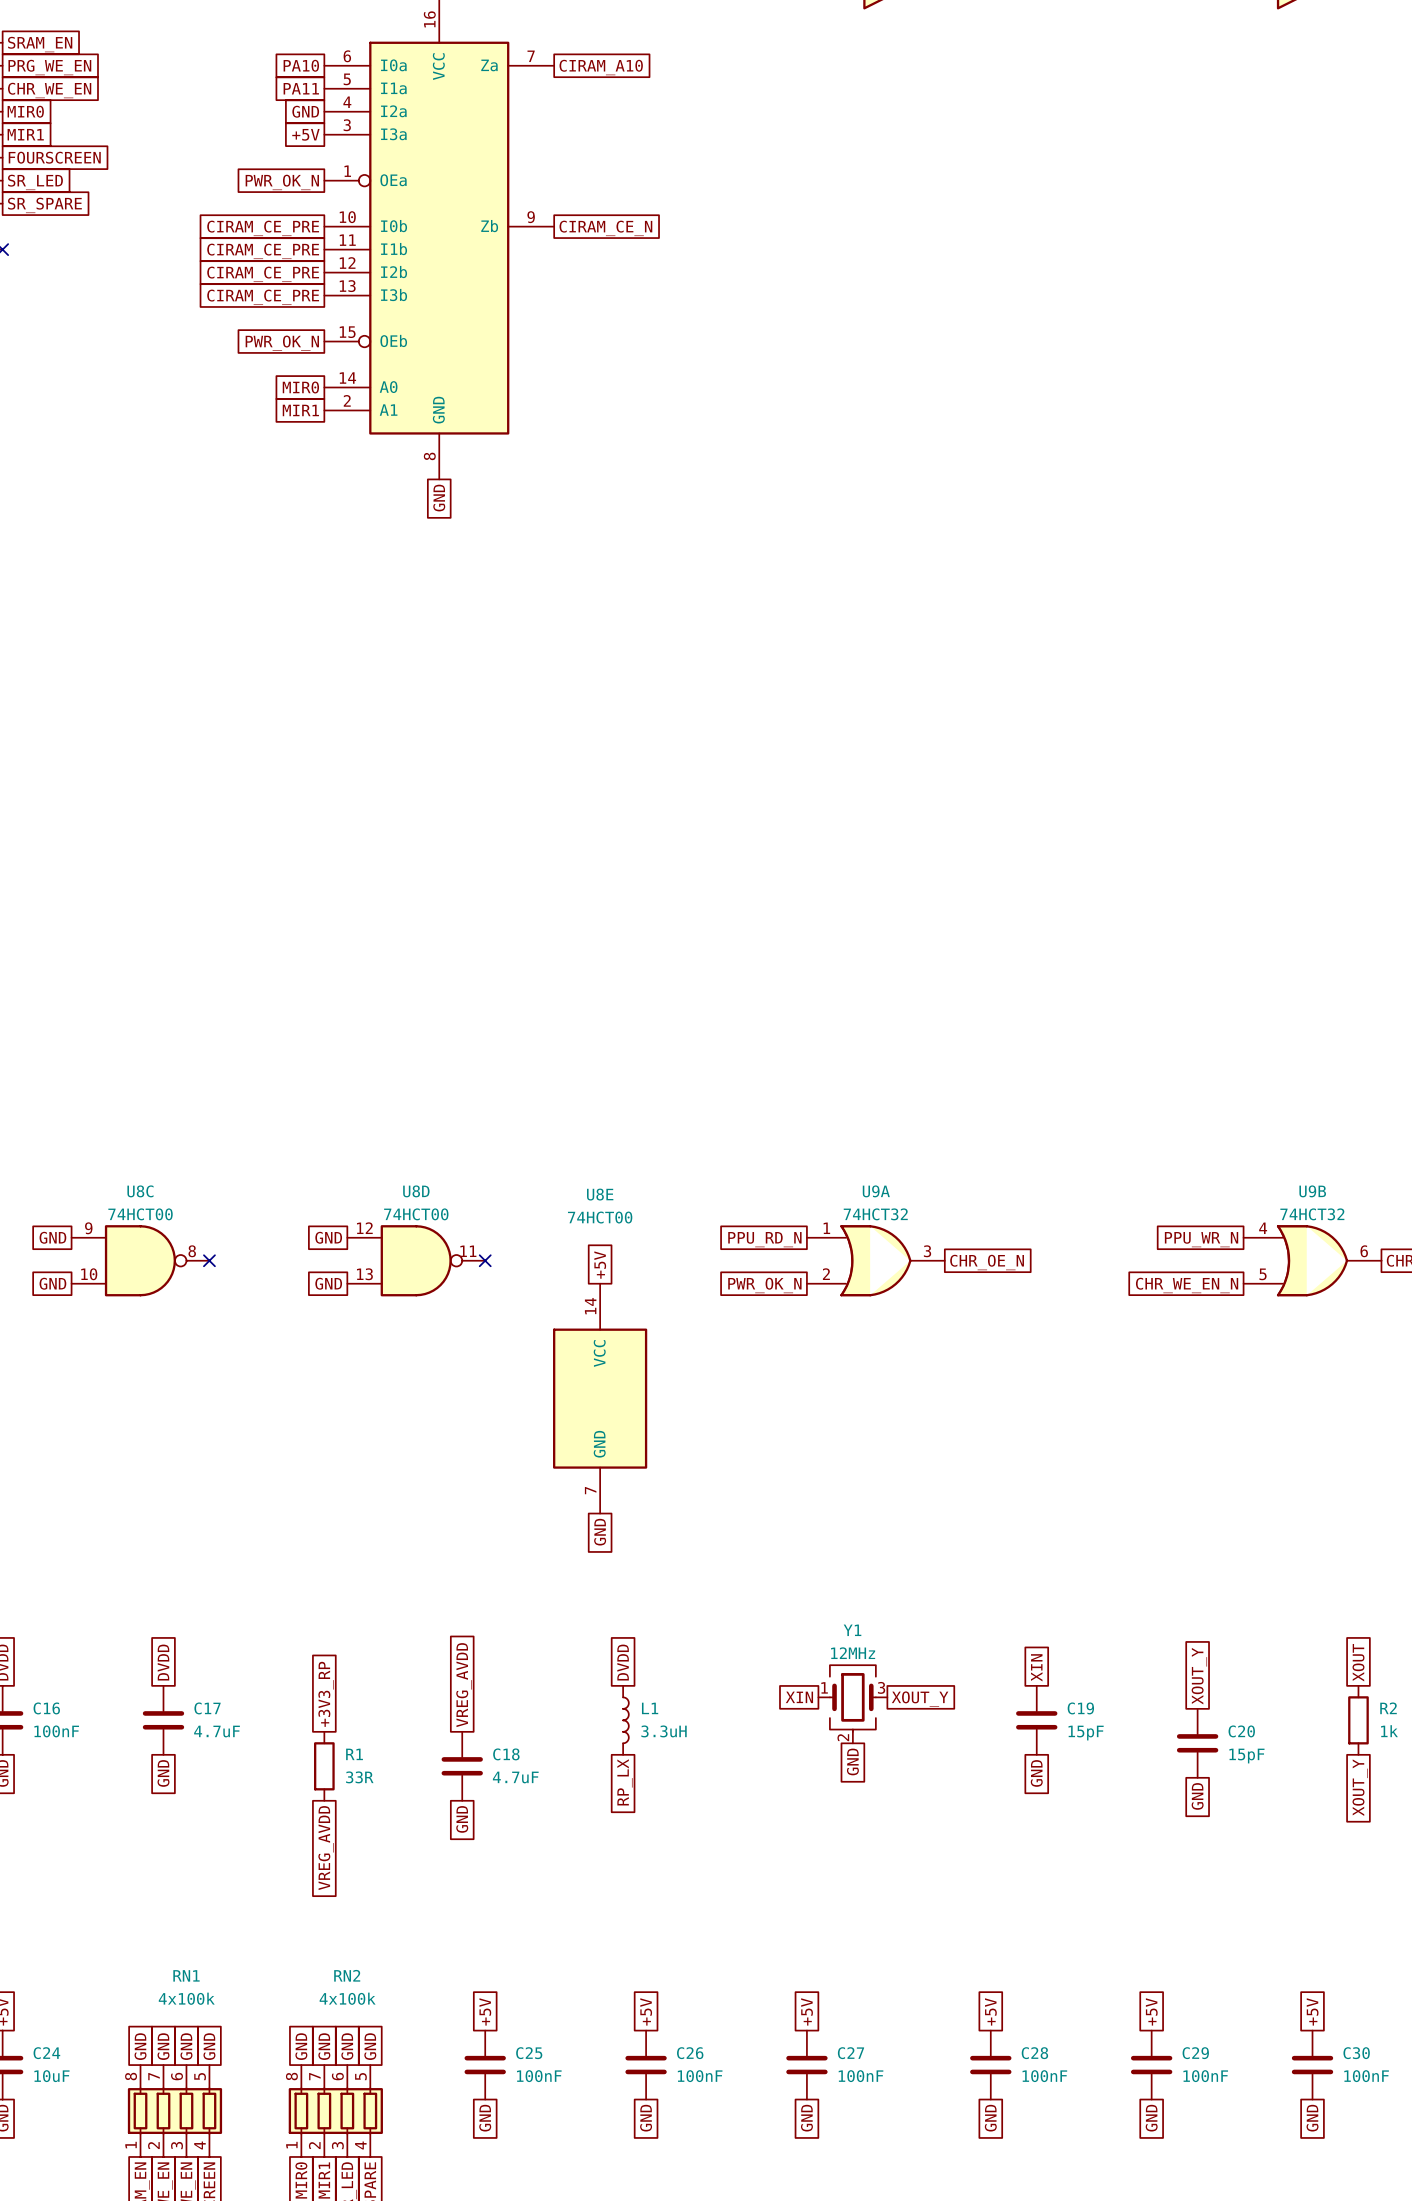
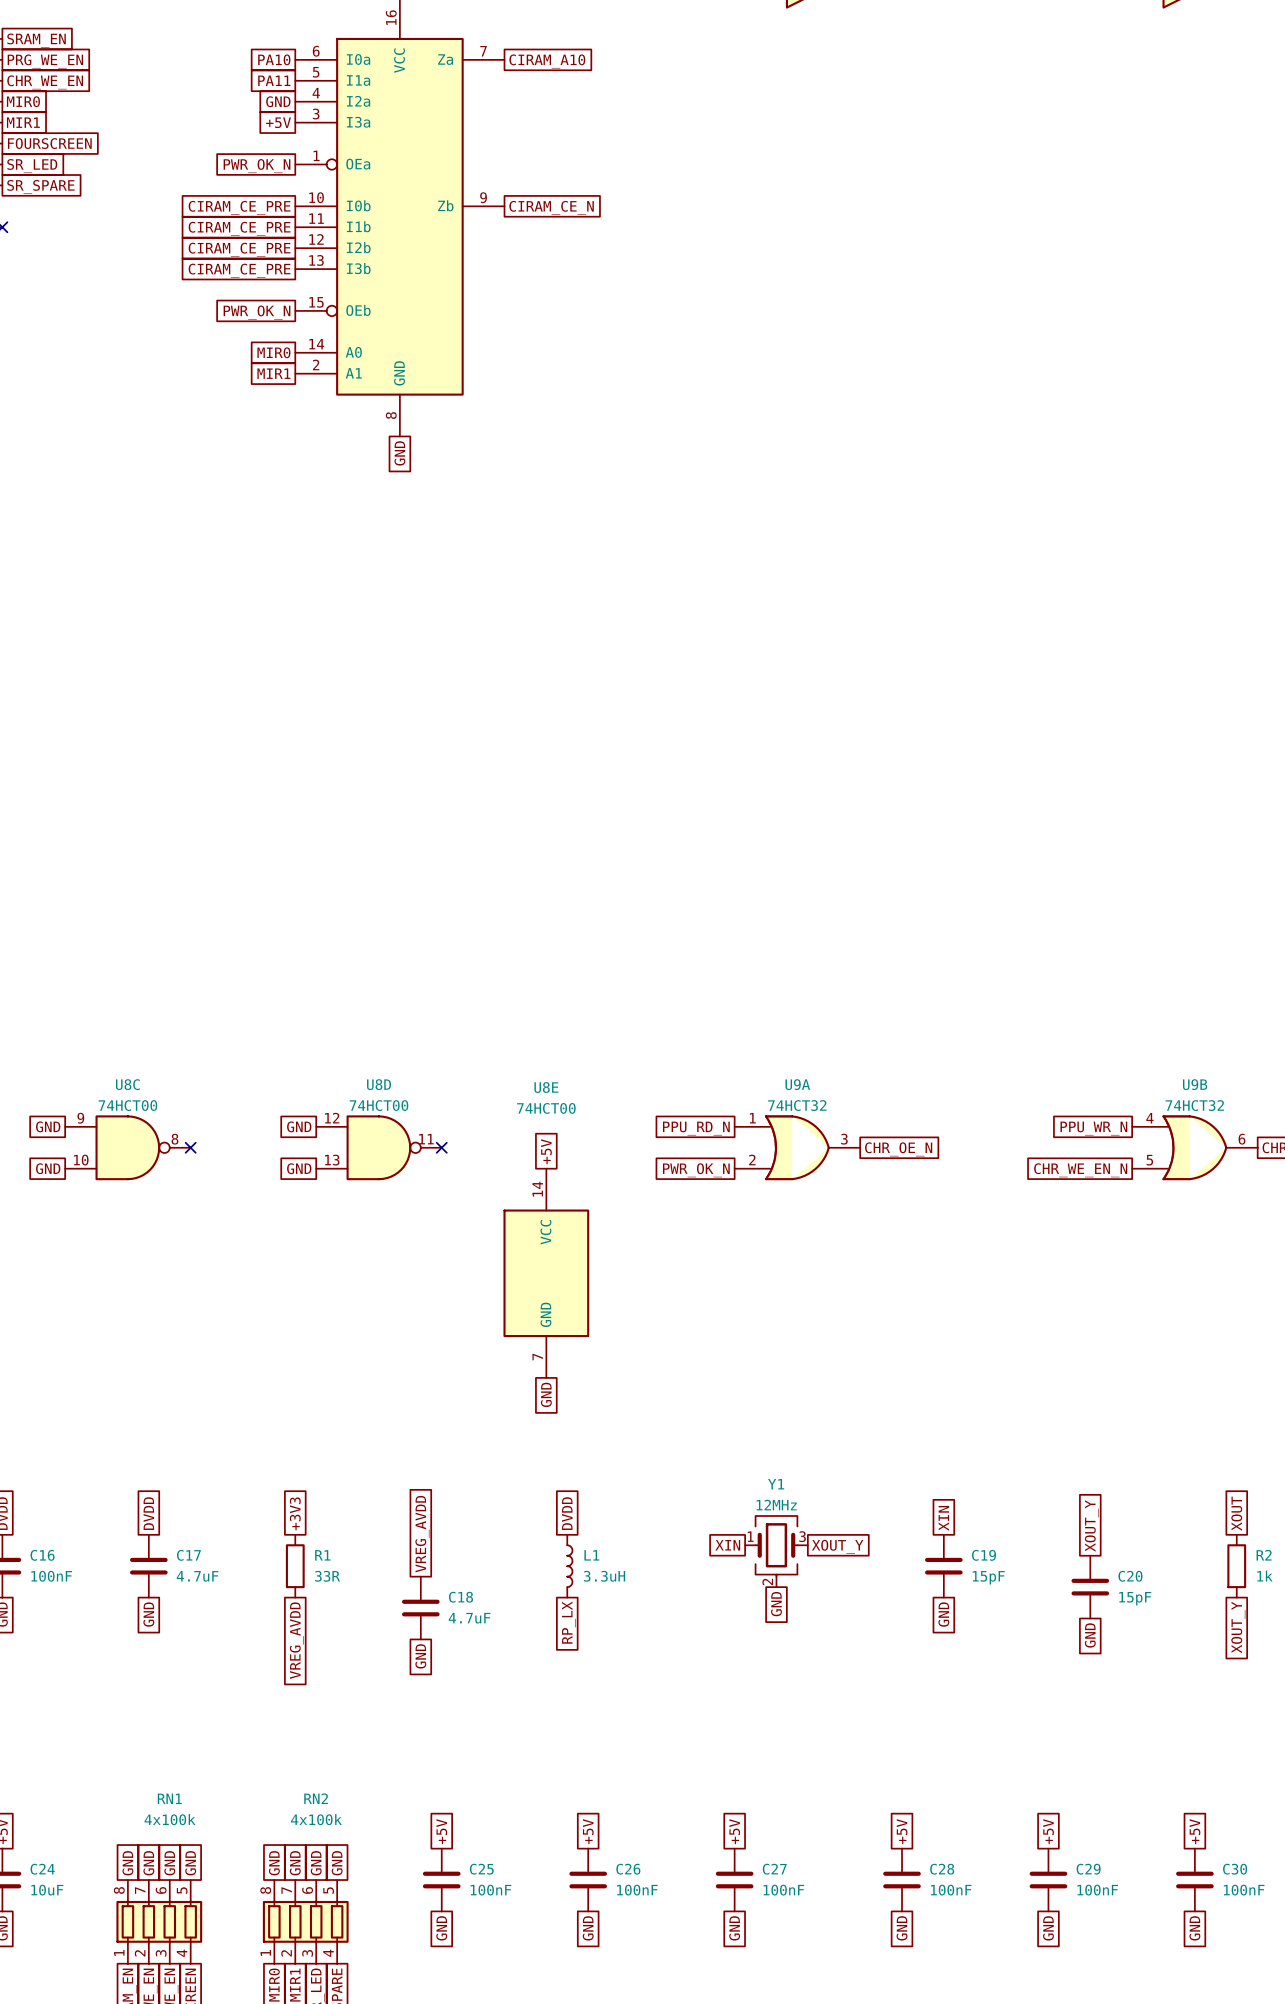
global label: +3V3_RP (326, 1694) -> +3V3 (295, 1513)
R1 position: (324, 1766) -> (295, 1566)
global label position: VREG_AVDD (326, 1848) -> VREG_AVDD (296, 1640)

